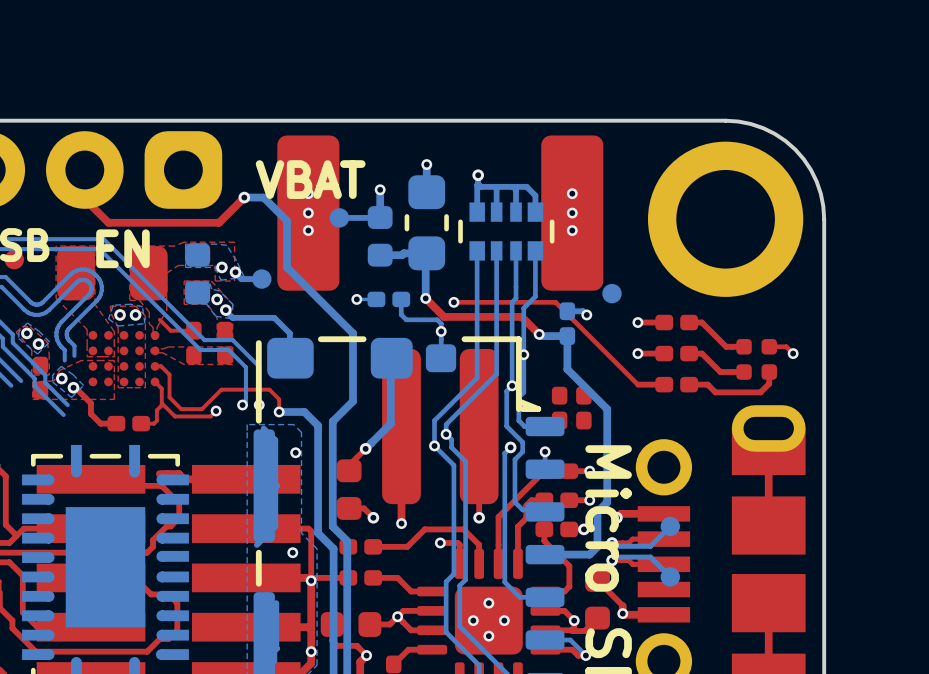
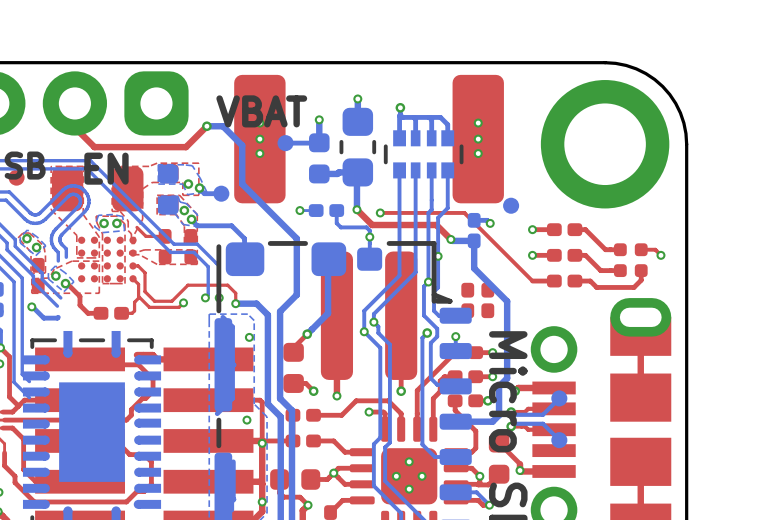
bottom track: none -> (22, 278) (22, 374) (29, 381)
bottom track: none -> (14, 281) (14, 382) (29, 397)
bottom track: none -> (31, 306) (43, 318) (58, 317)
via: none -> (31, 306)

